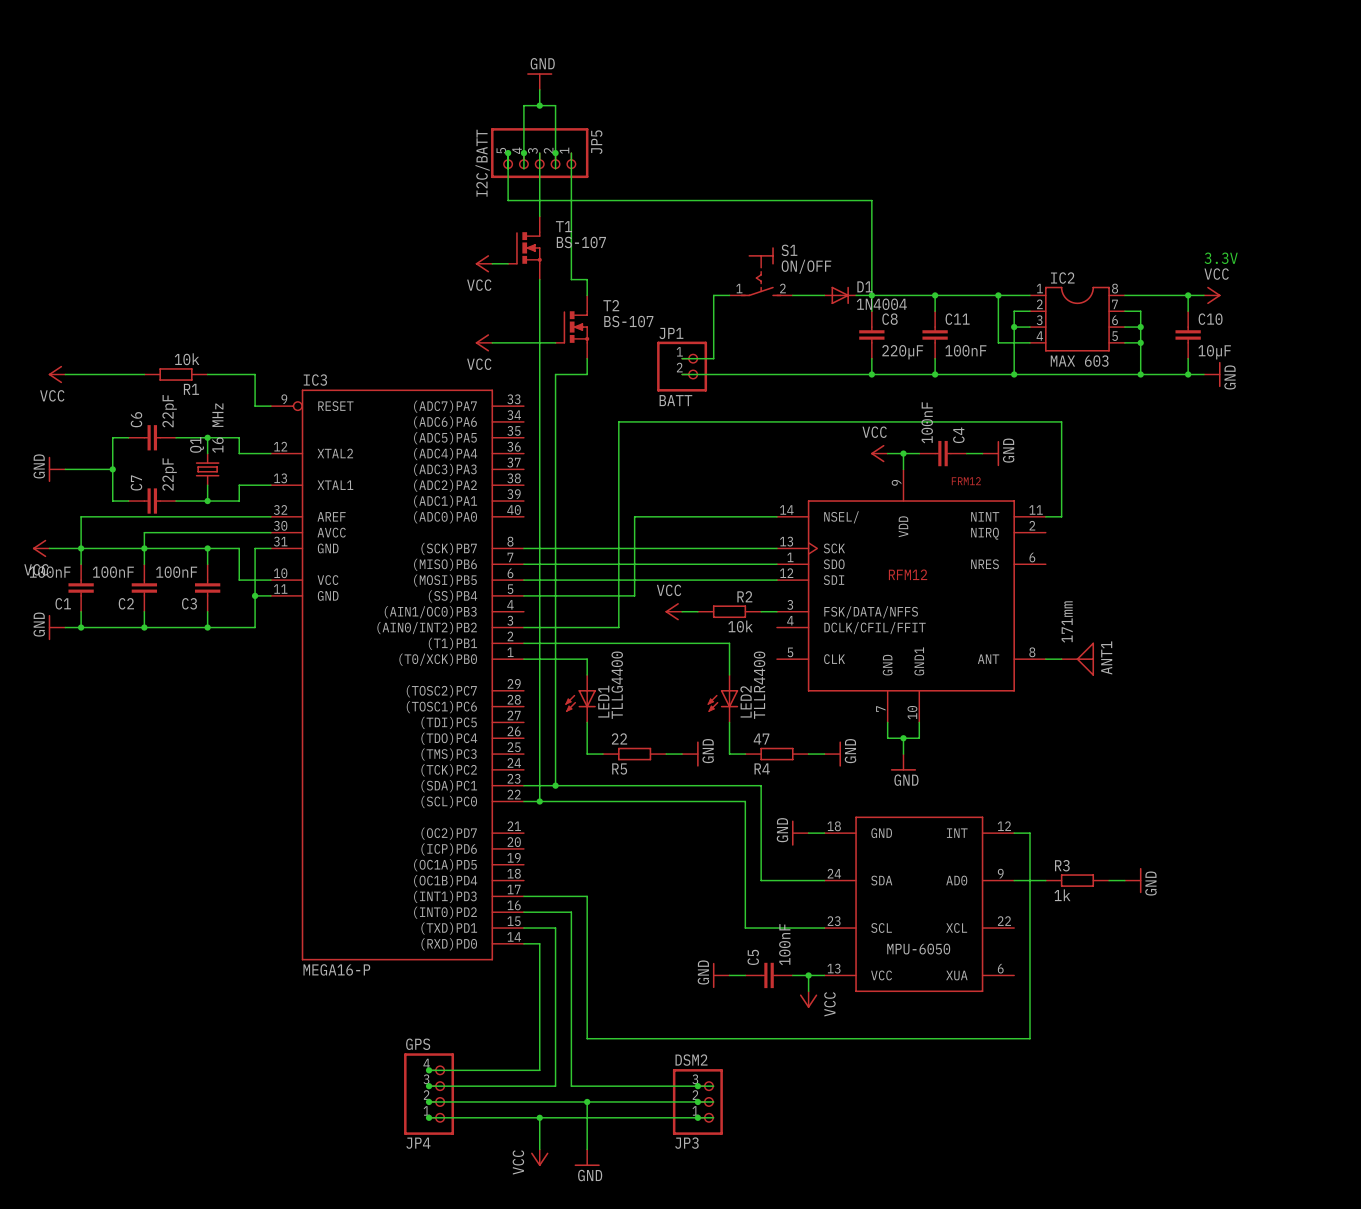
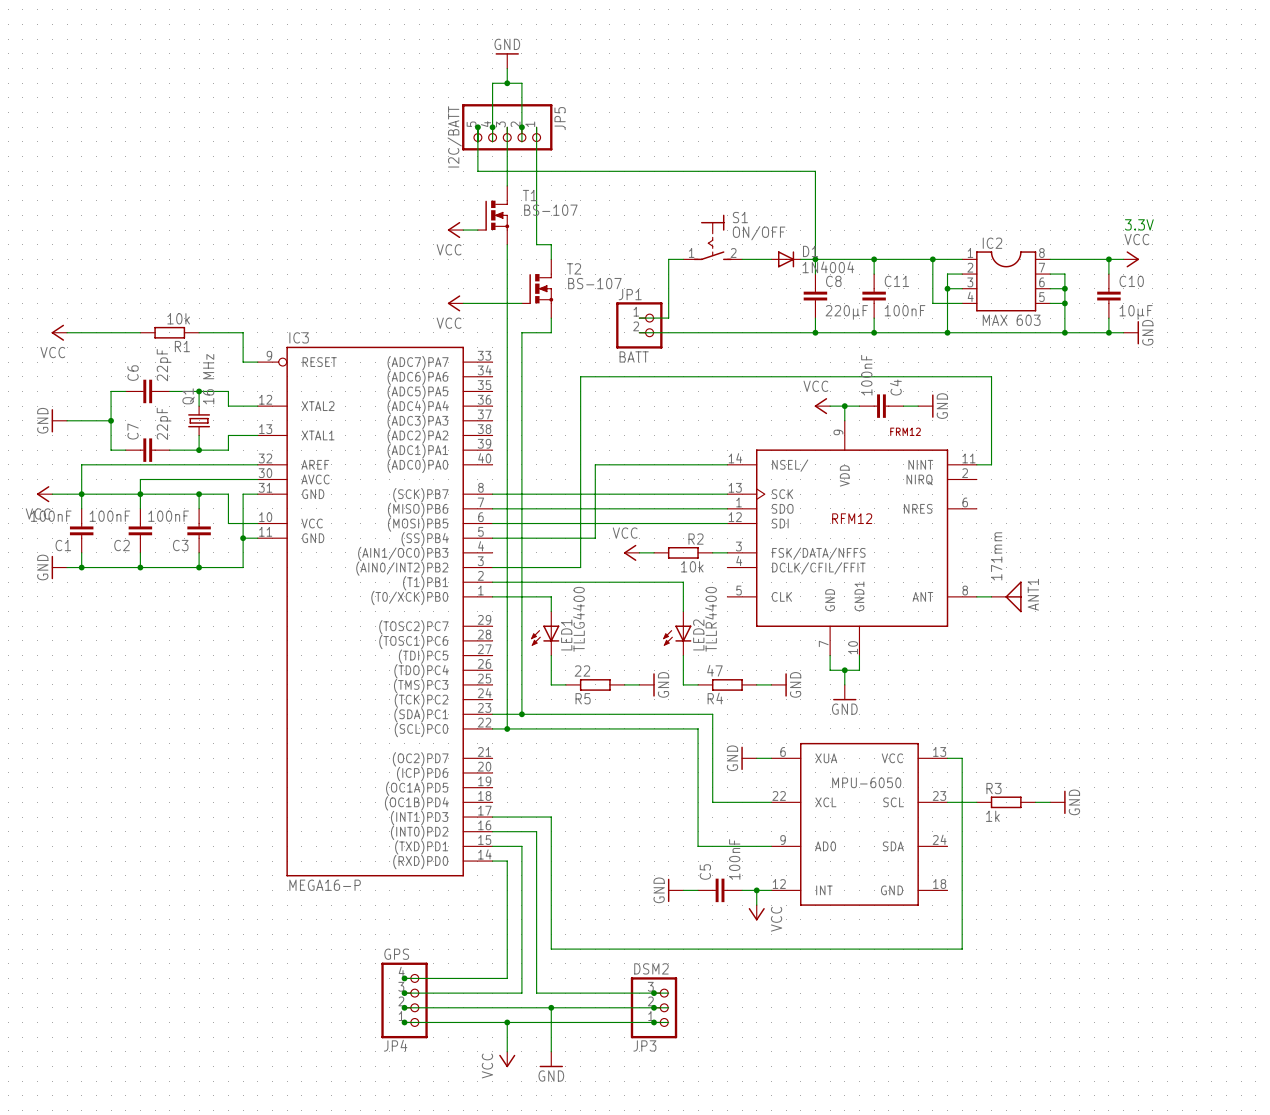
part symbol: [824, 816, 1015, 993] -> [771, 742, 948, 906]

